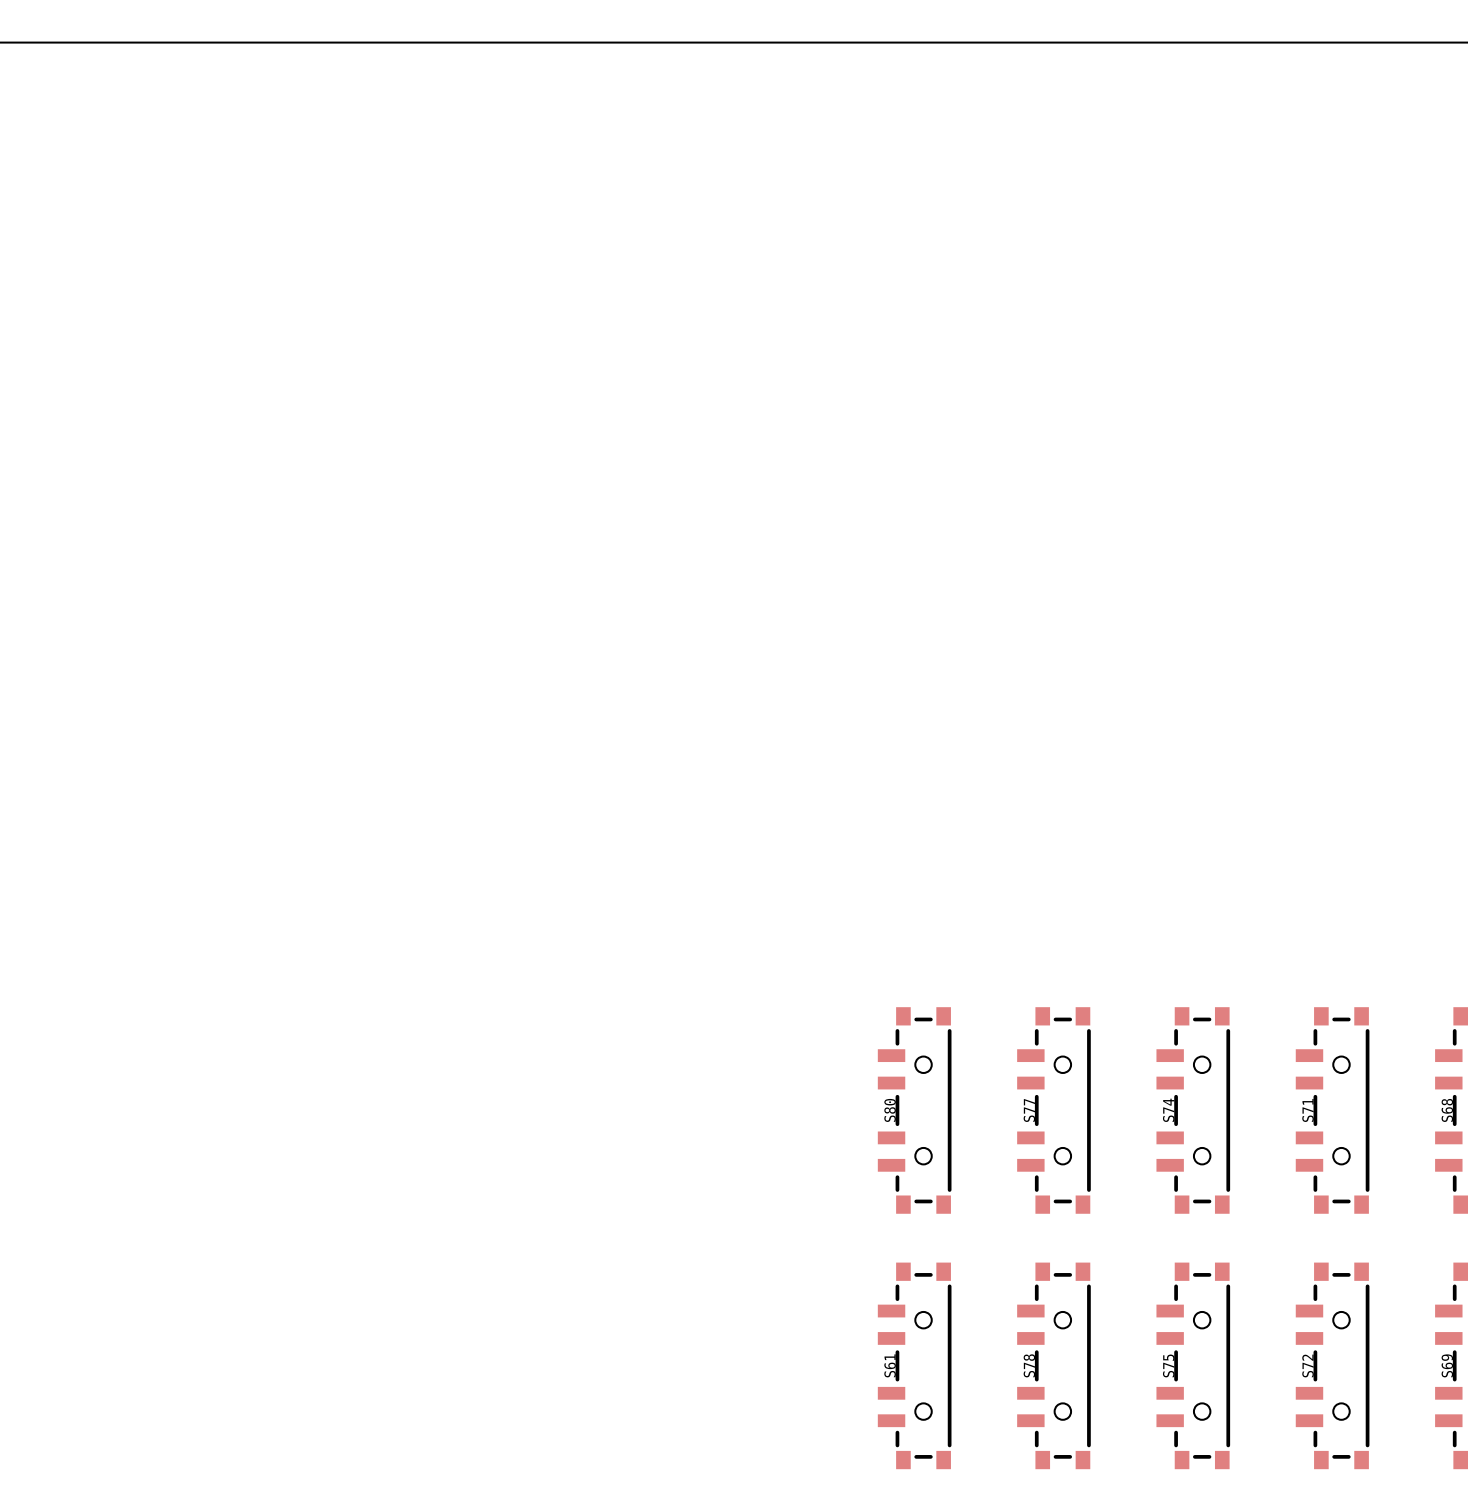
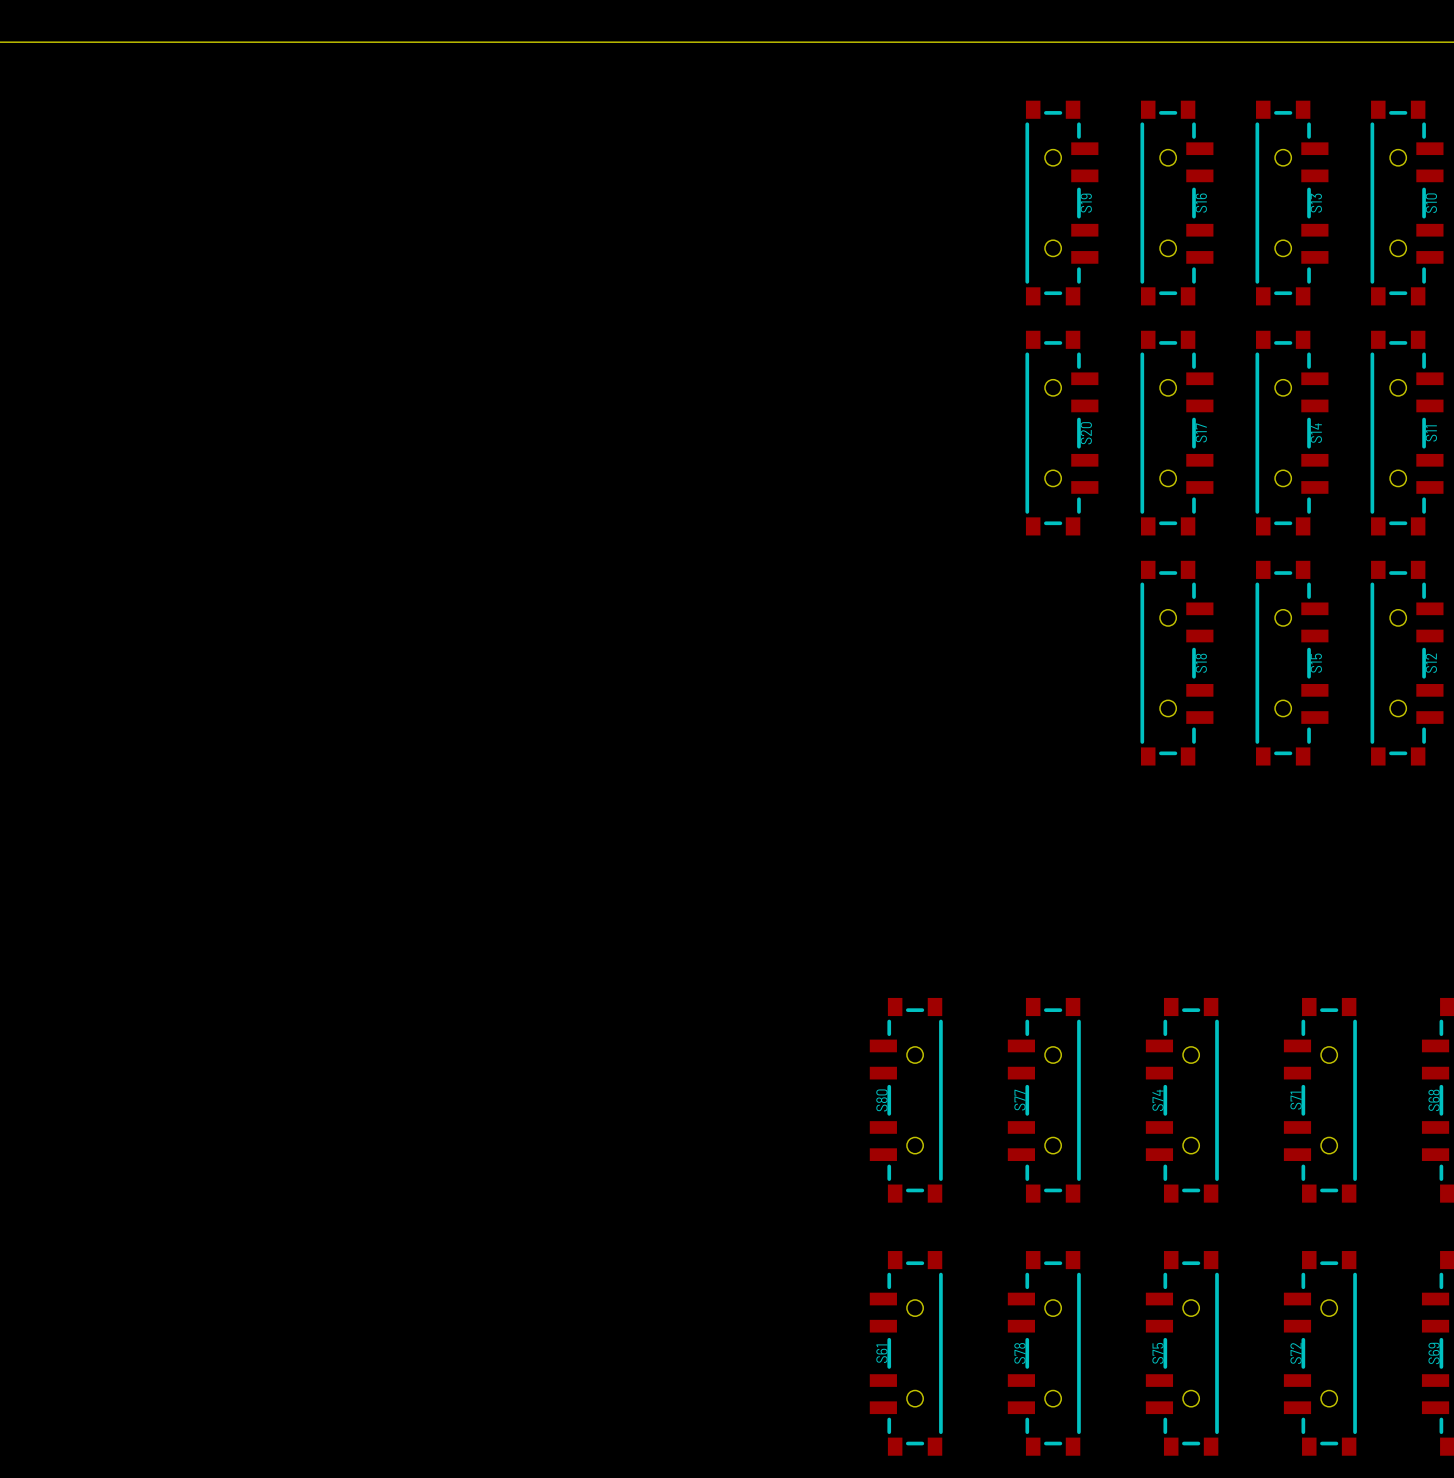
S19: none -> (1061, 203)
S16: none -> (1176, 203)
S13: none -> (1291, 203)
S10: none -> (1407, 203)
S20: none -> (1061, 433)
S17: none -> (1176, 433)
S14: none -> (1291, 433)
S11: none -> (1407, 433)
S18: none -> (1176, 663)
S15: none -> (1291, 663)
S12: none -> (1407, 663)

